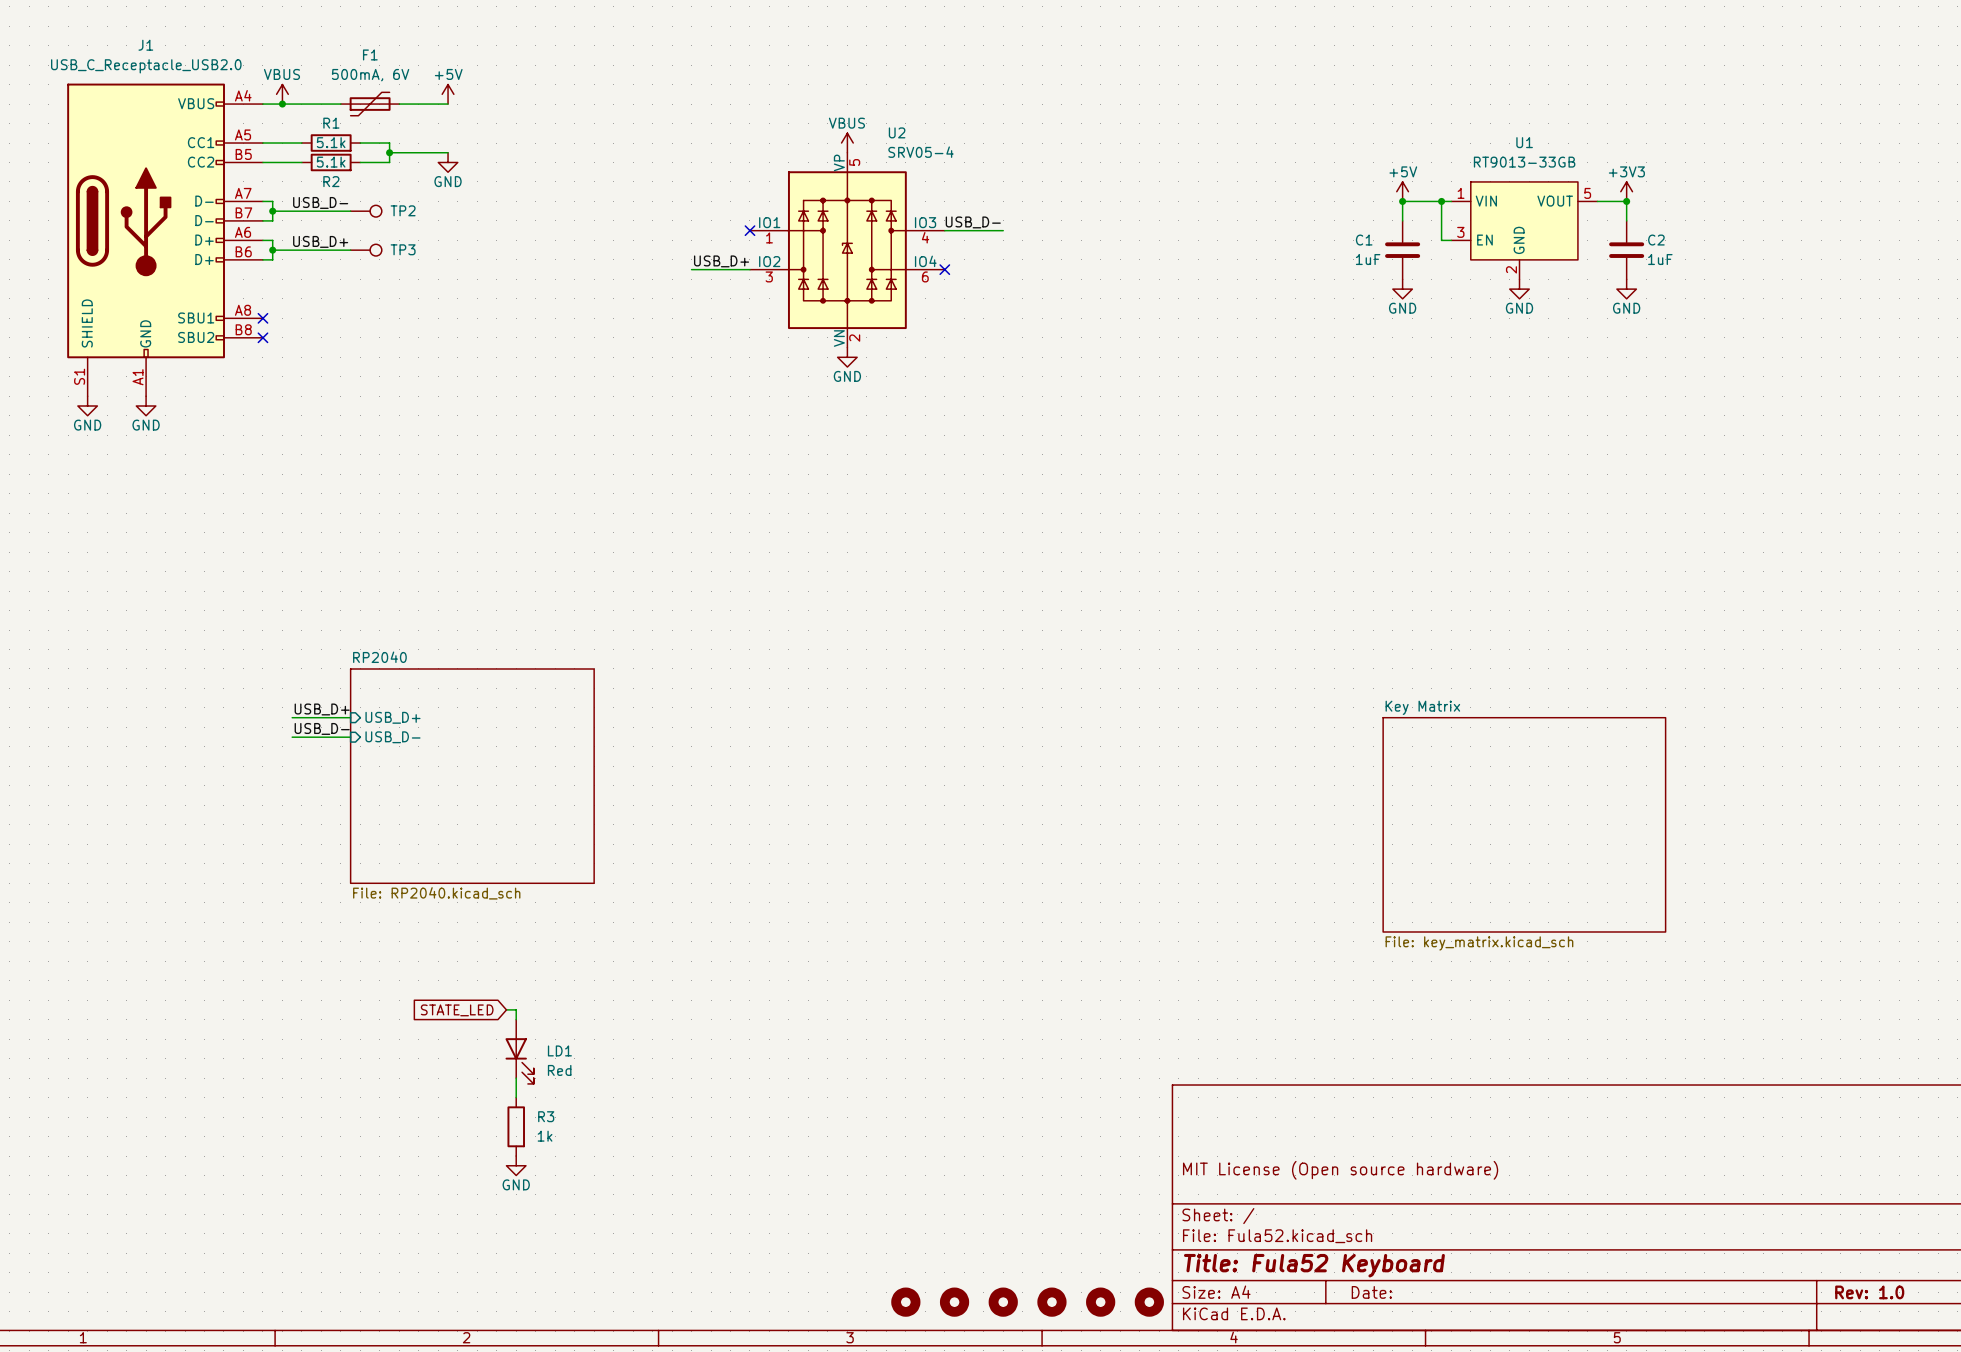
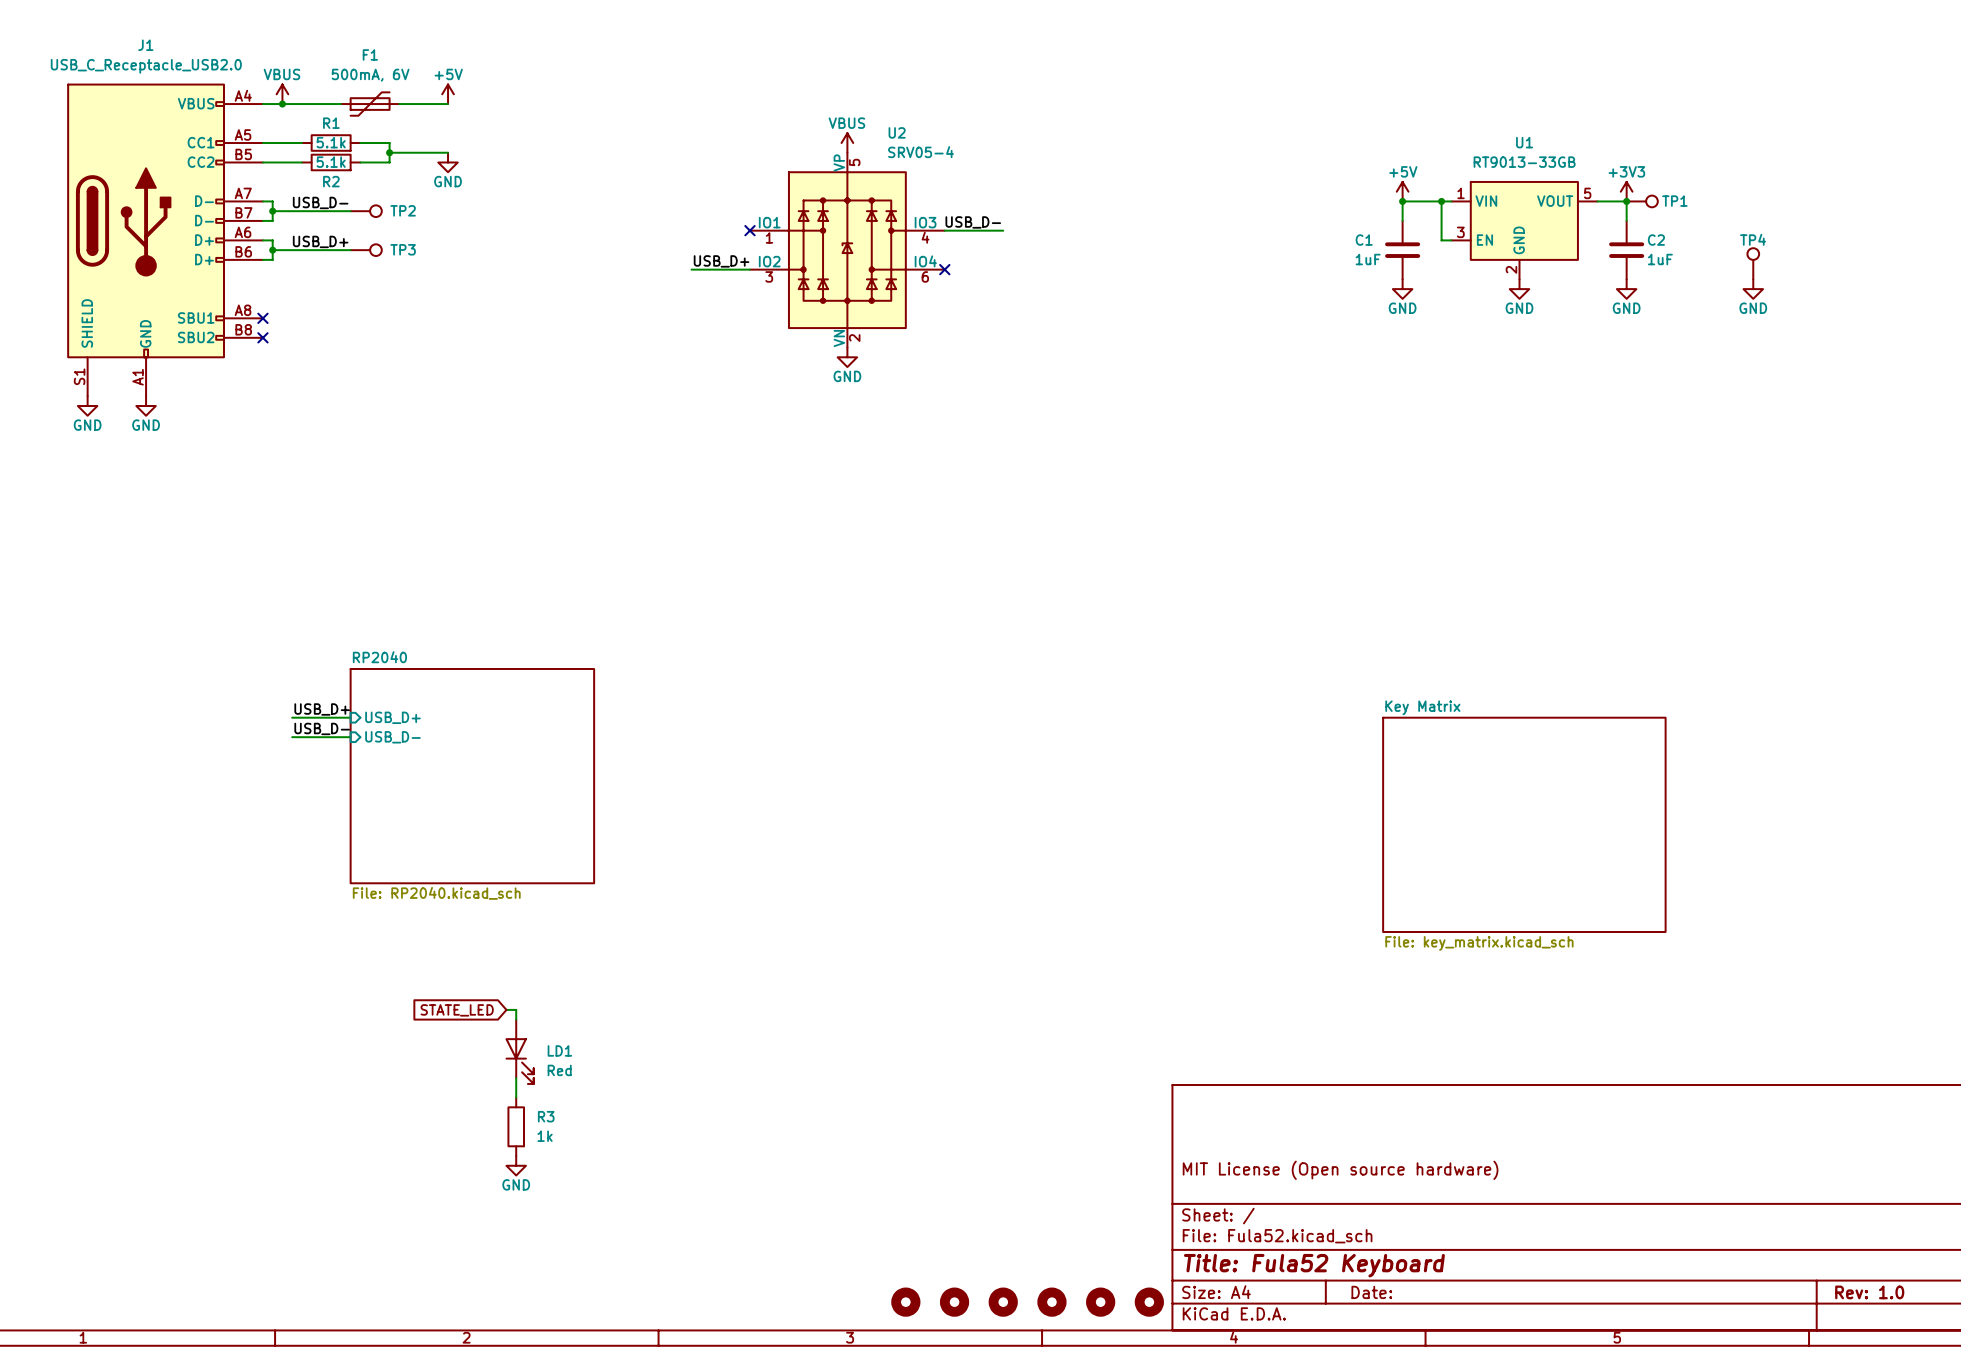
TP1: none -> (1642, 201)
TP4: none -> (1753, 263)
power symbol: none -> GND (1753, 289)

